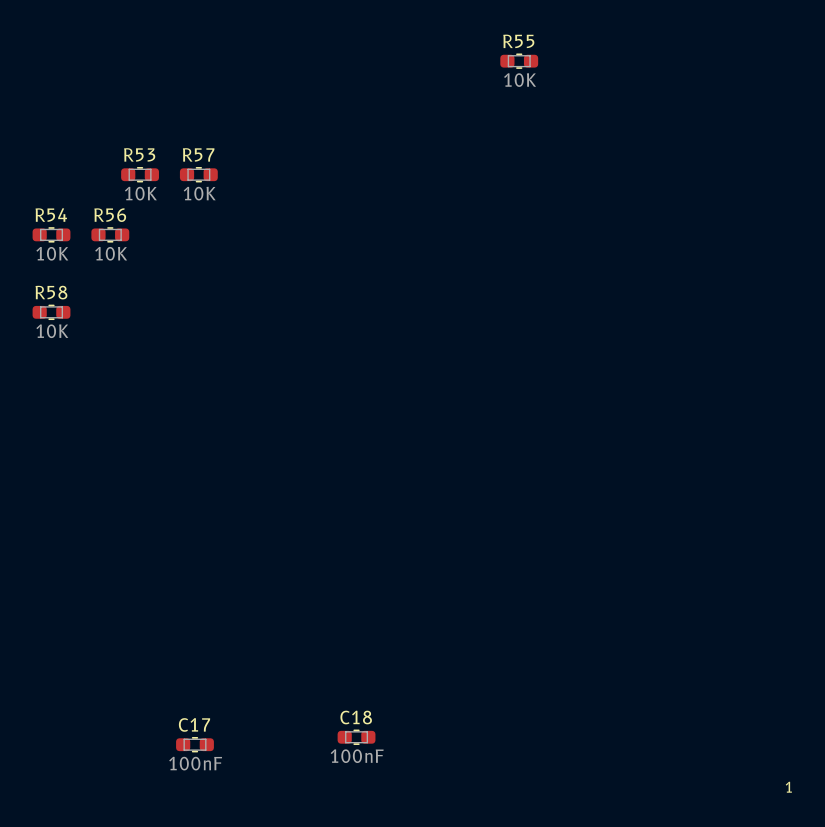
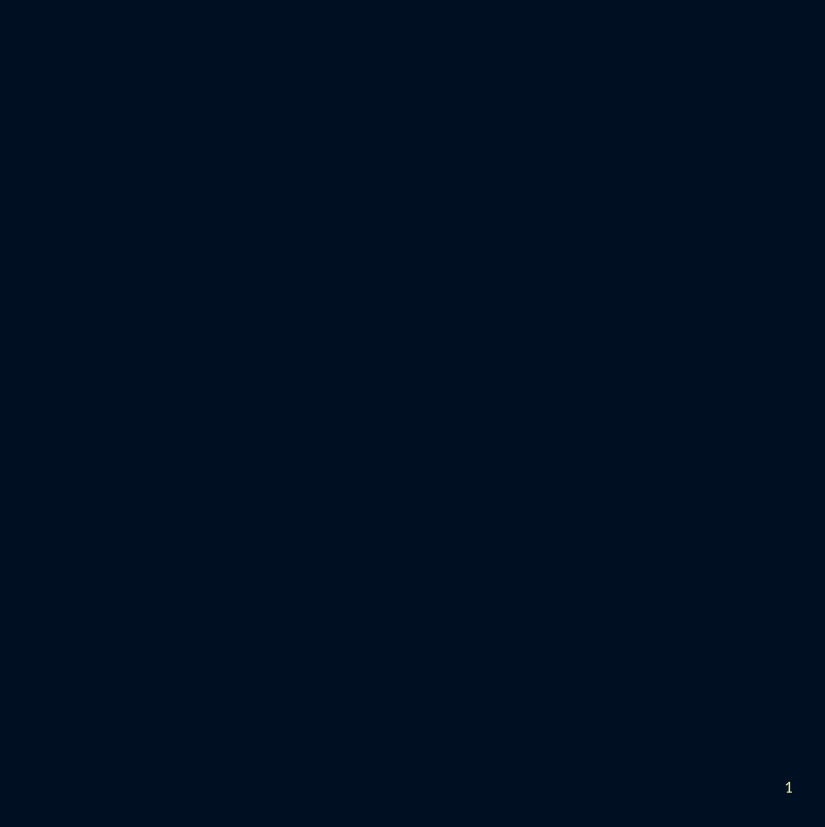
R55: 10K (519, 61) -> none
R53: 10K (140, 174) -> none
R57: 10K (198, 174) -> none
R54: 10K (51, 234) -> none
R56: 10K (110, 234) -> none
R58: 10K (51, 312) -> none
C18: 100nF (356, 737) -> none
C17: 100nF (194, 744) -> none

